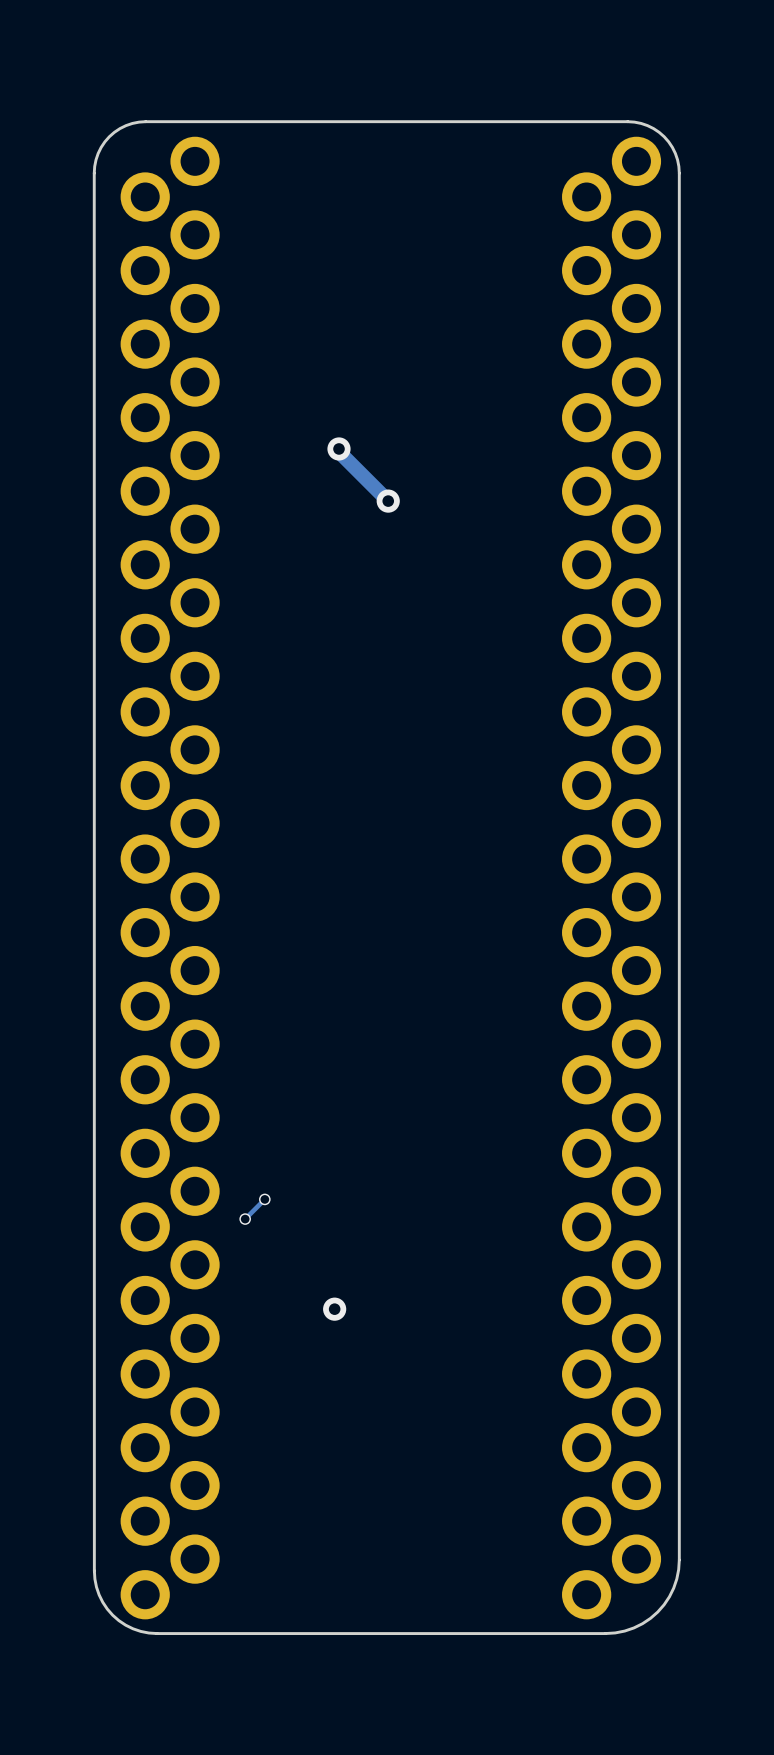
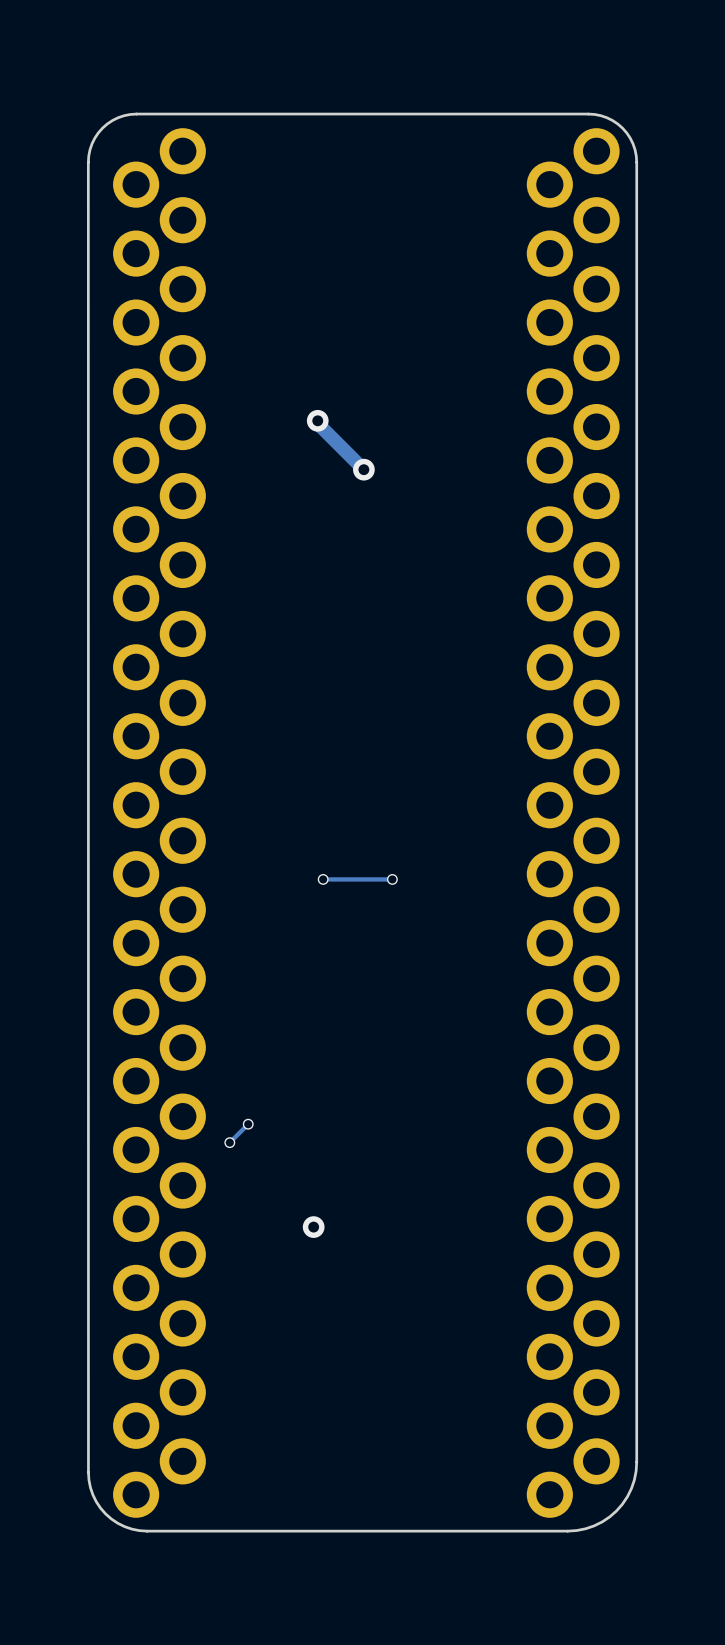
via: none -> (323, 879)
track: none -> (392, 879) (323, 879)
via: none -> (392, 879)

